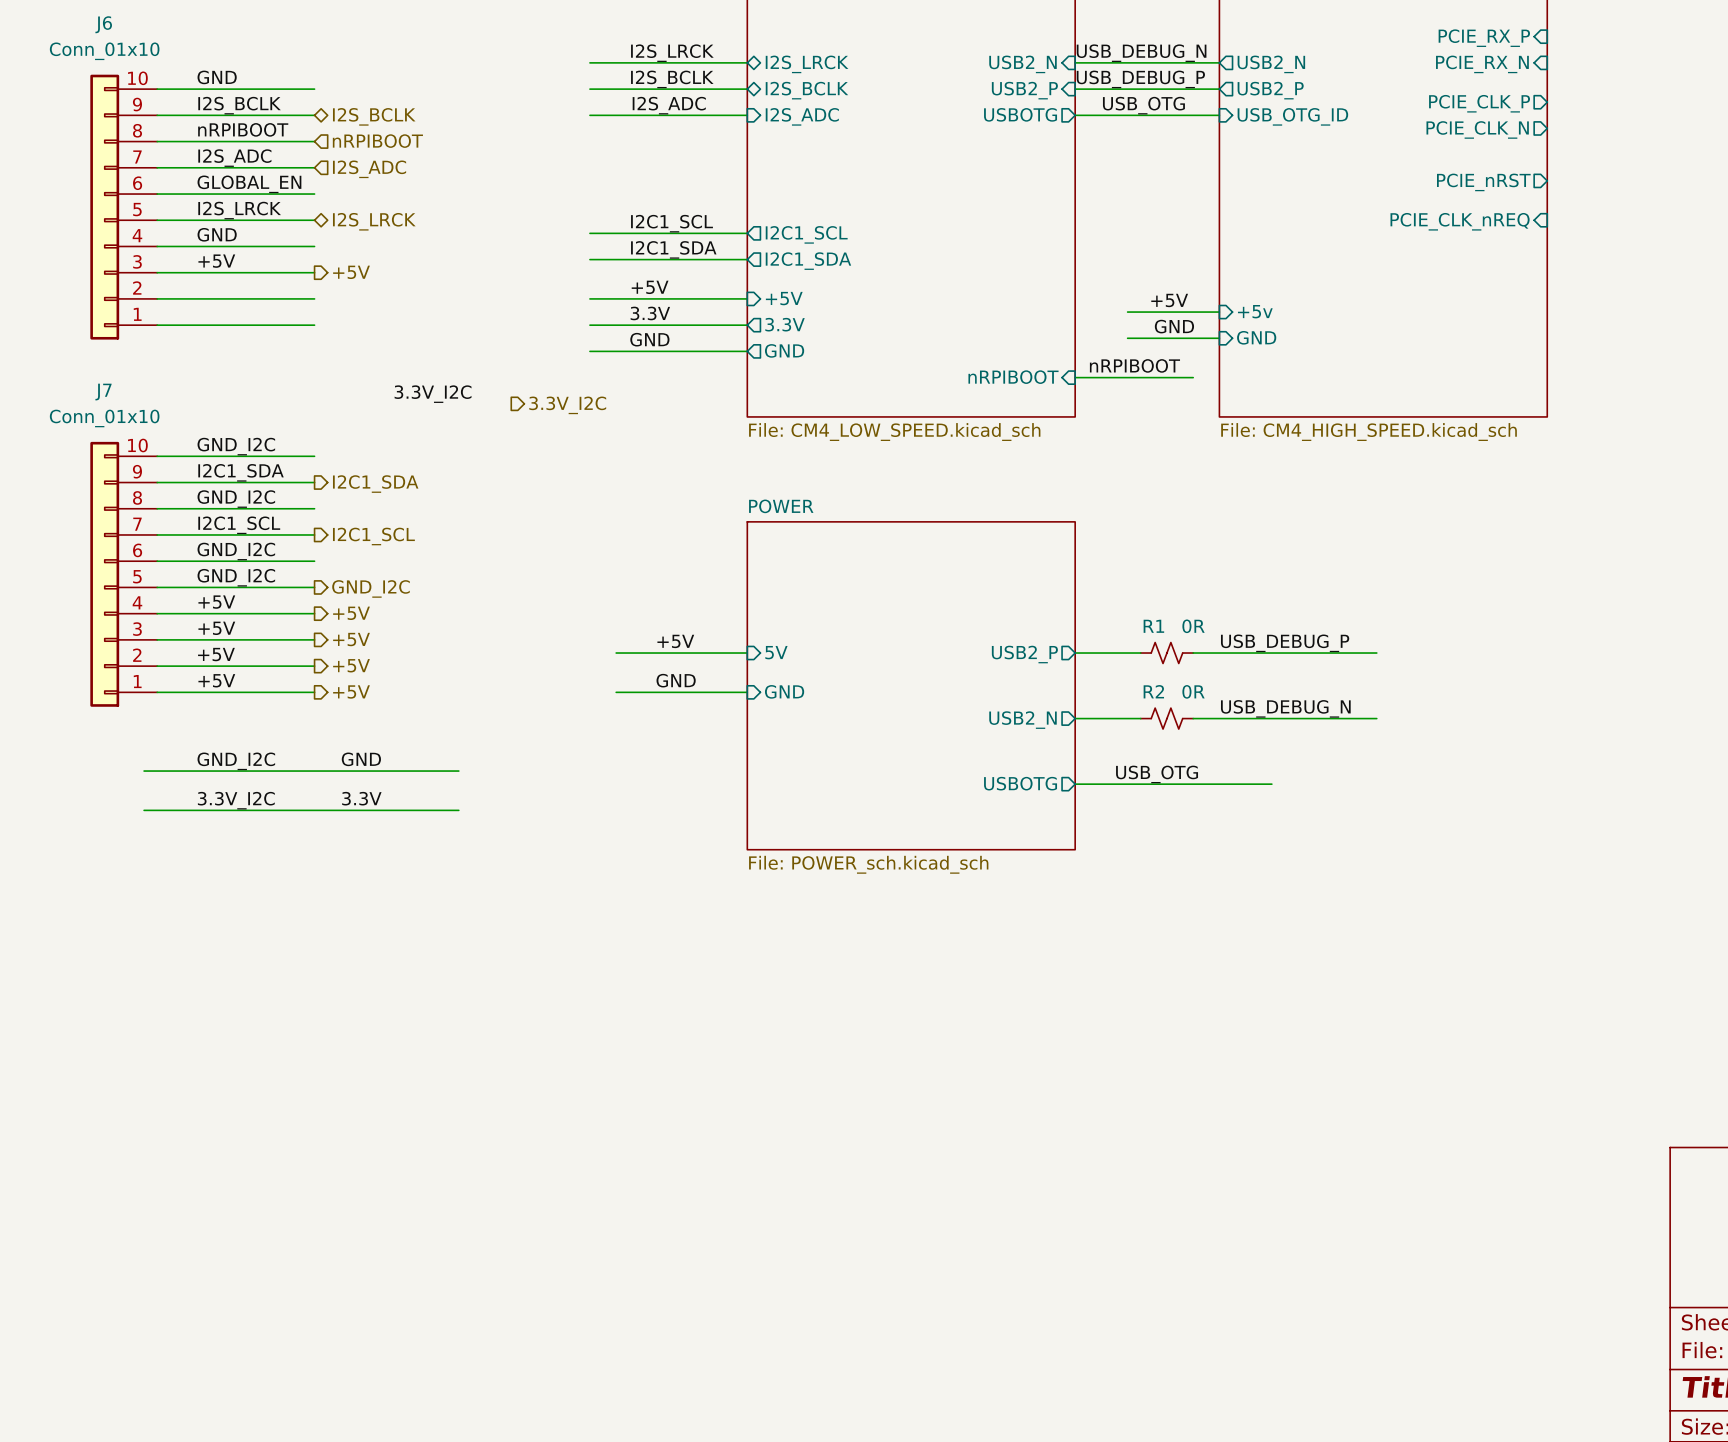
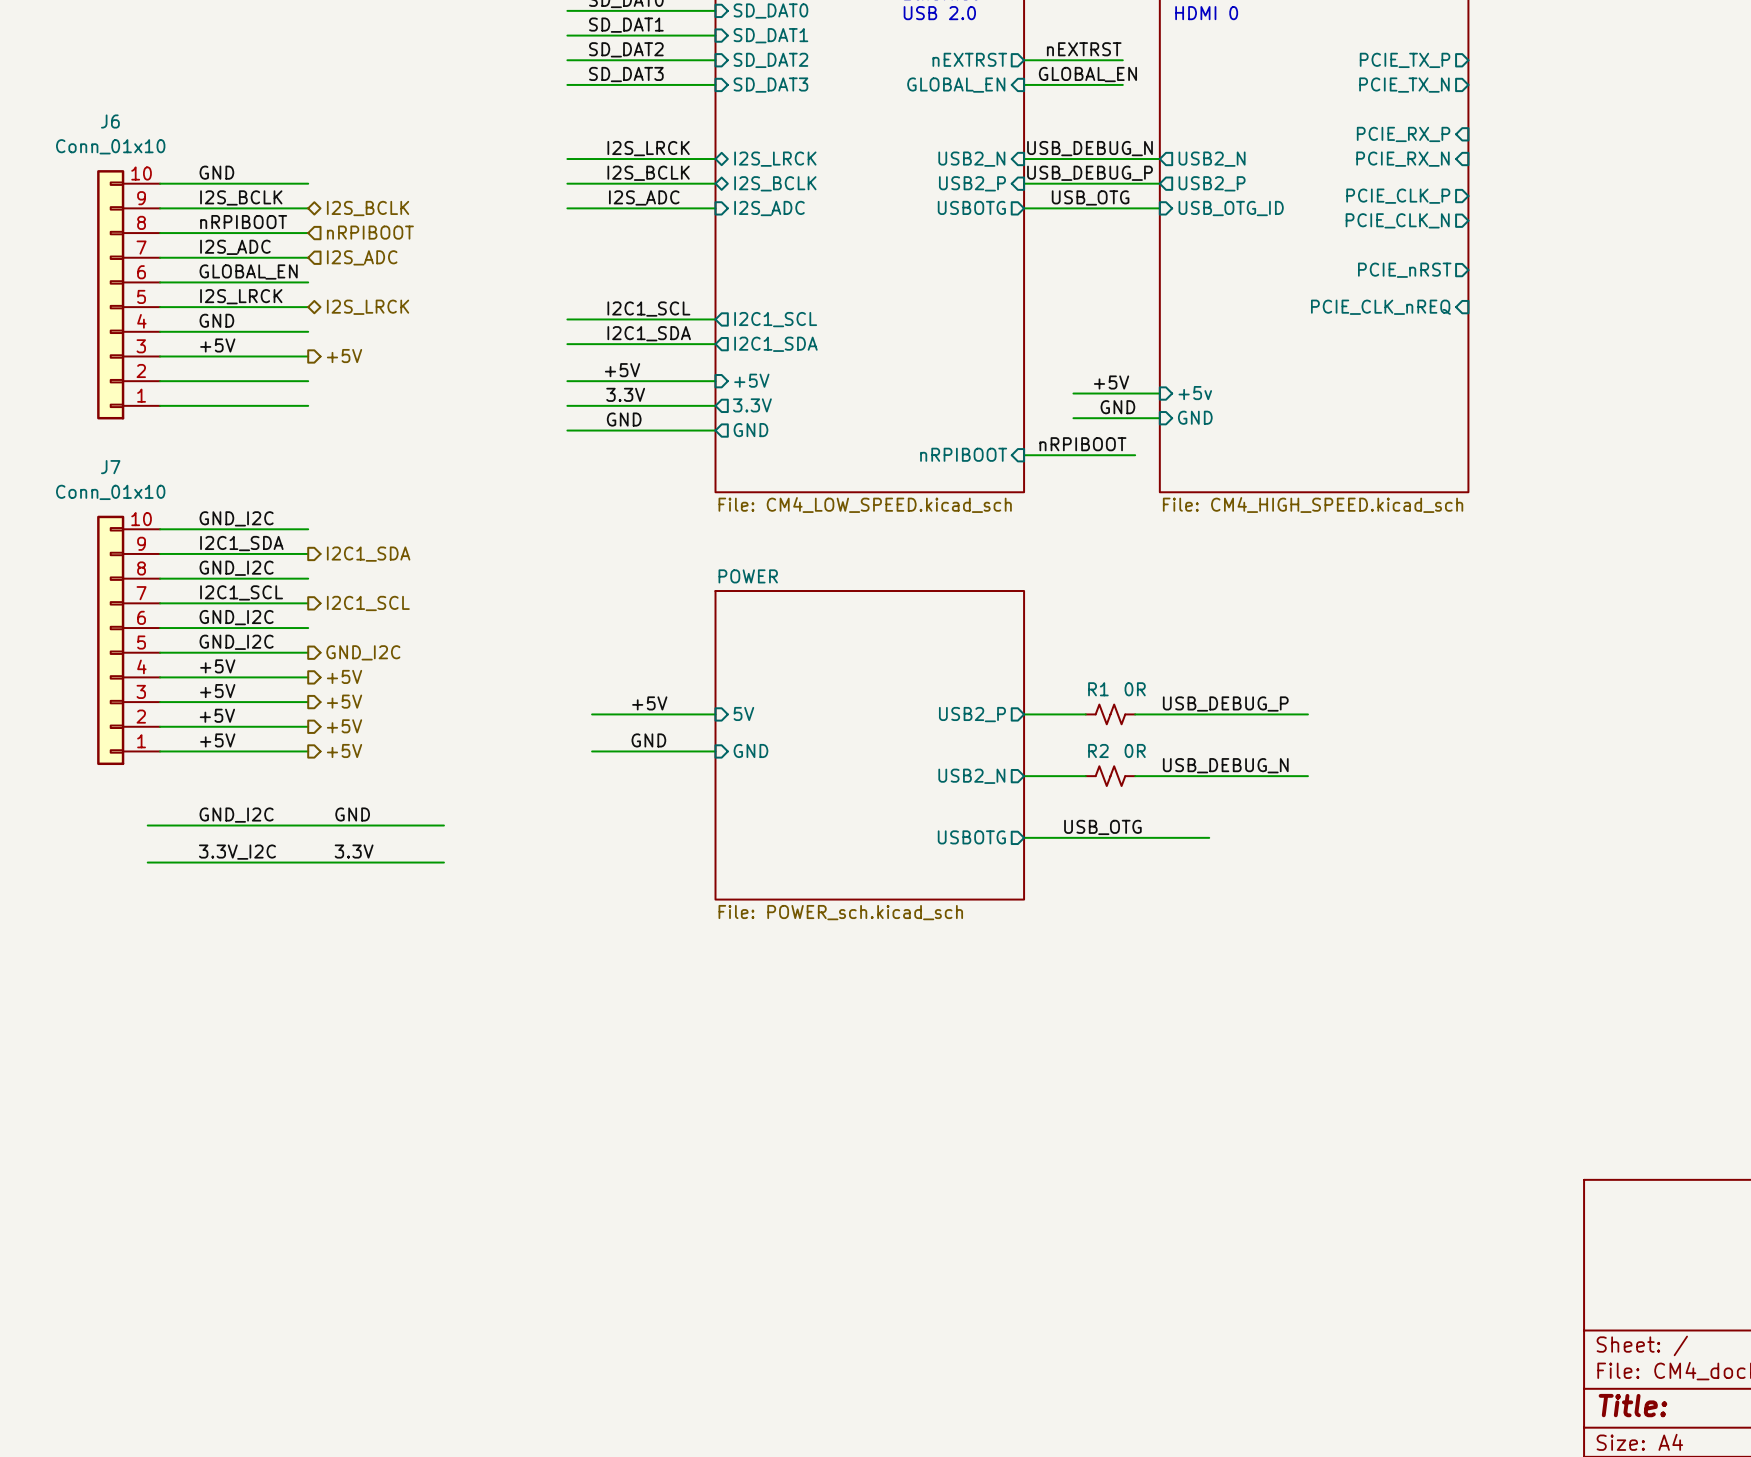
label: 3.3V_I2C (433, 394) -> none
hierarchical label: 3.3V_I2C (567, 405) -> none

